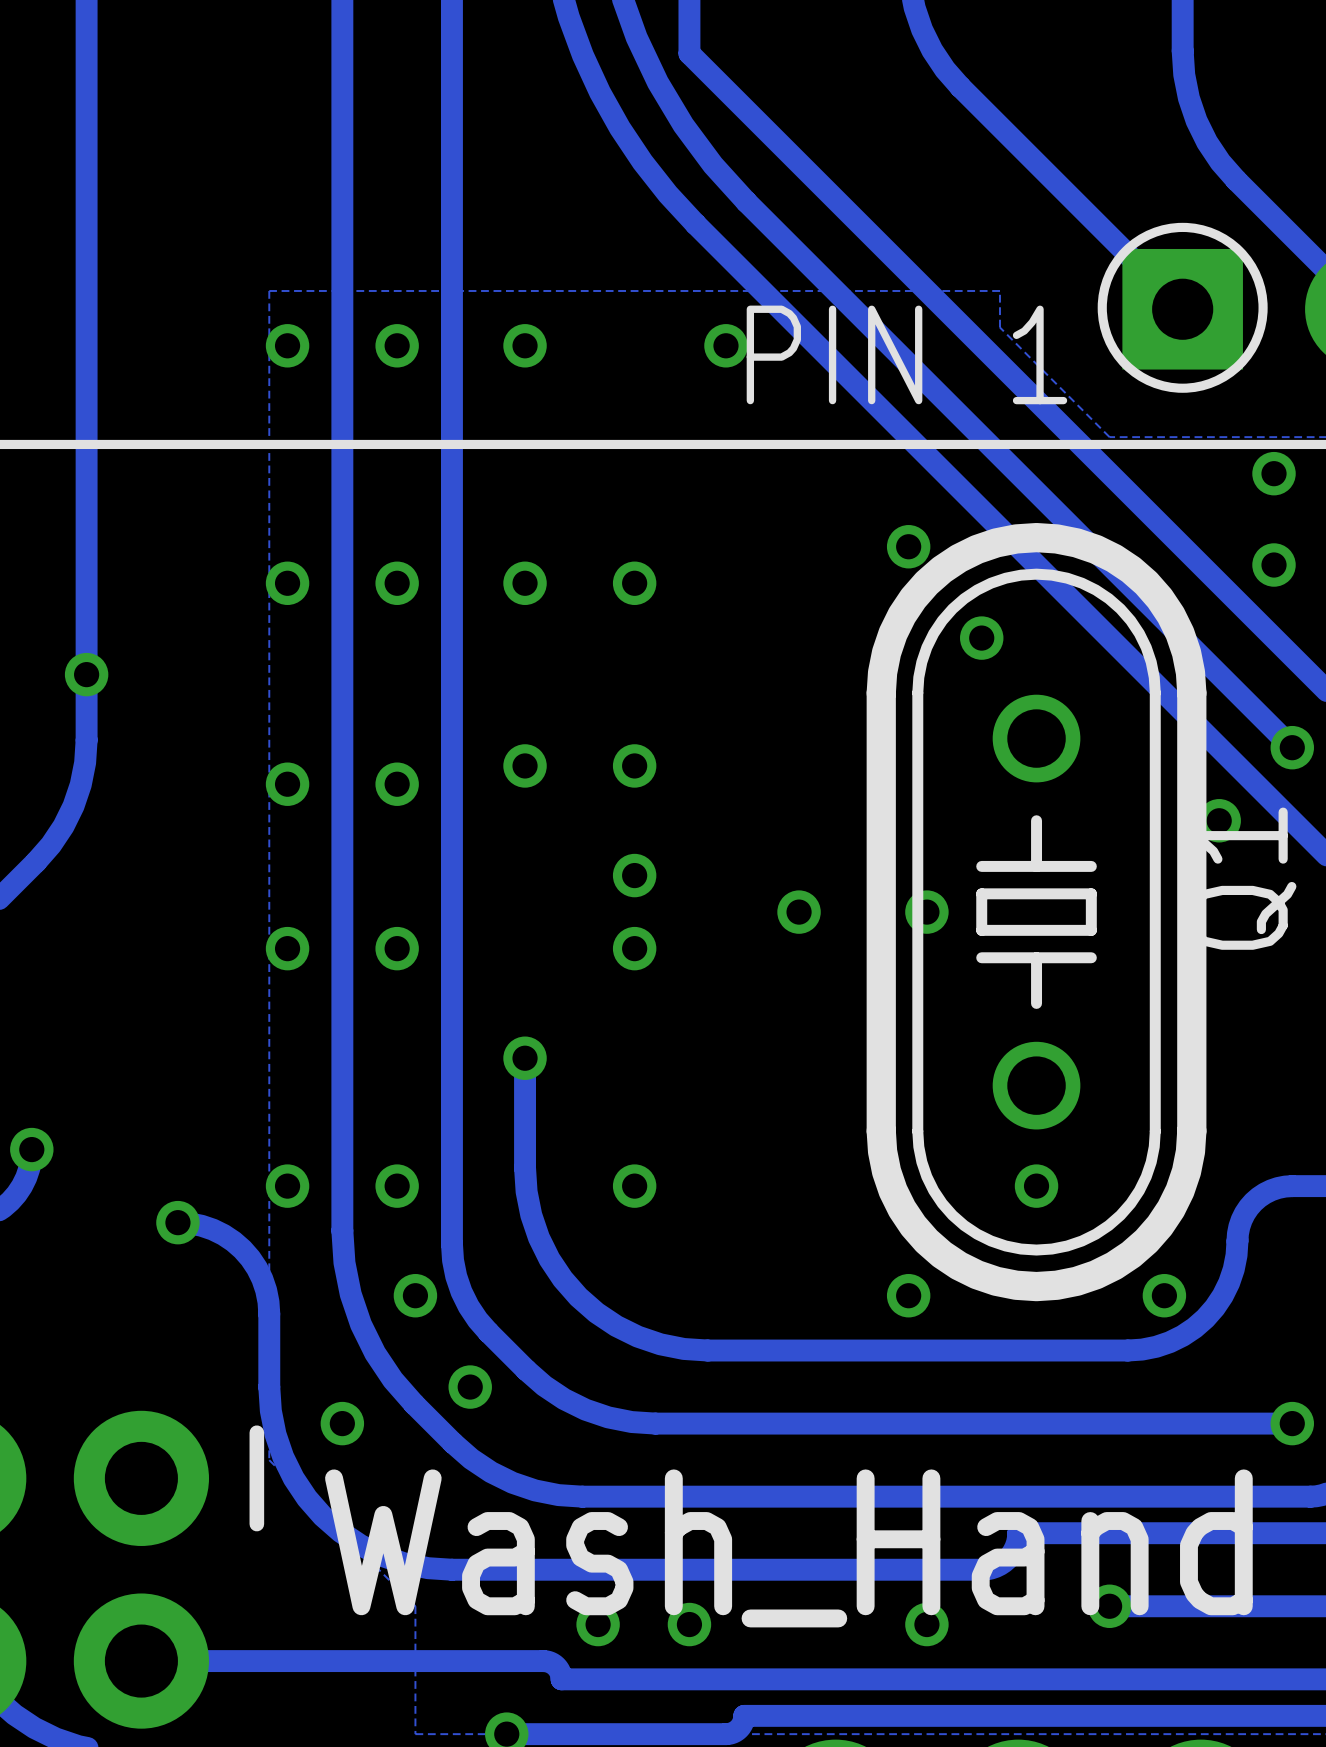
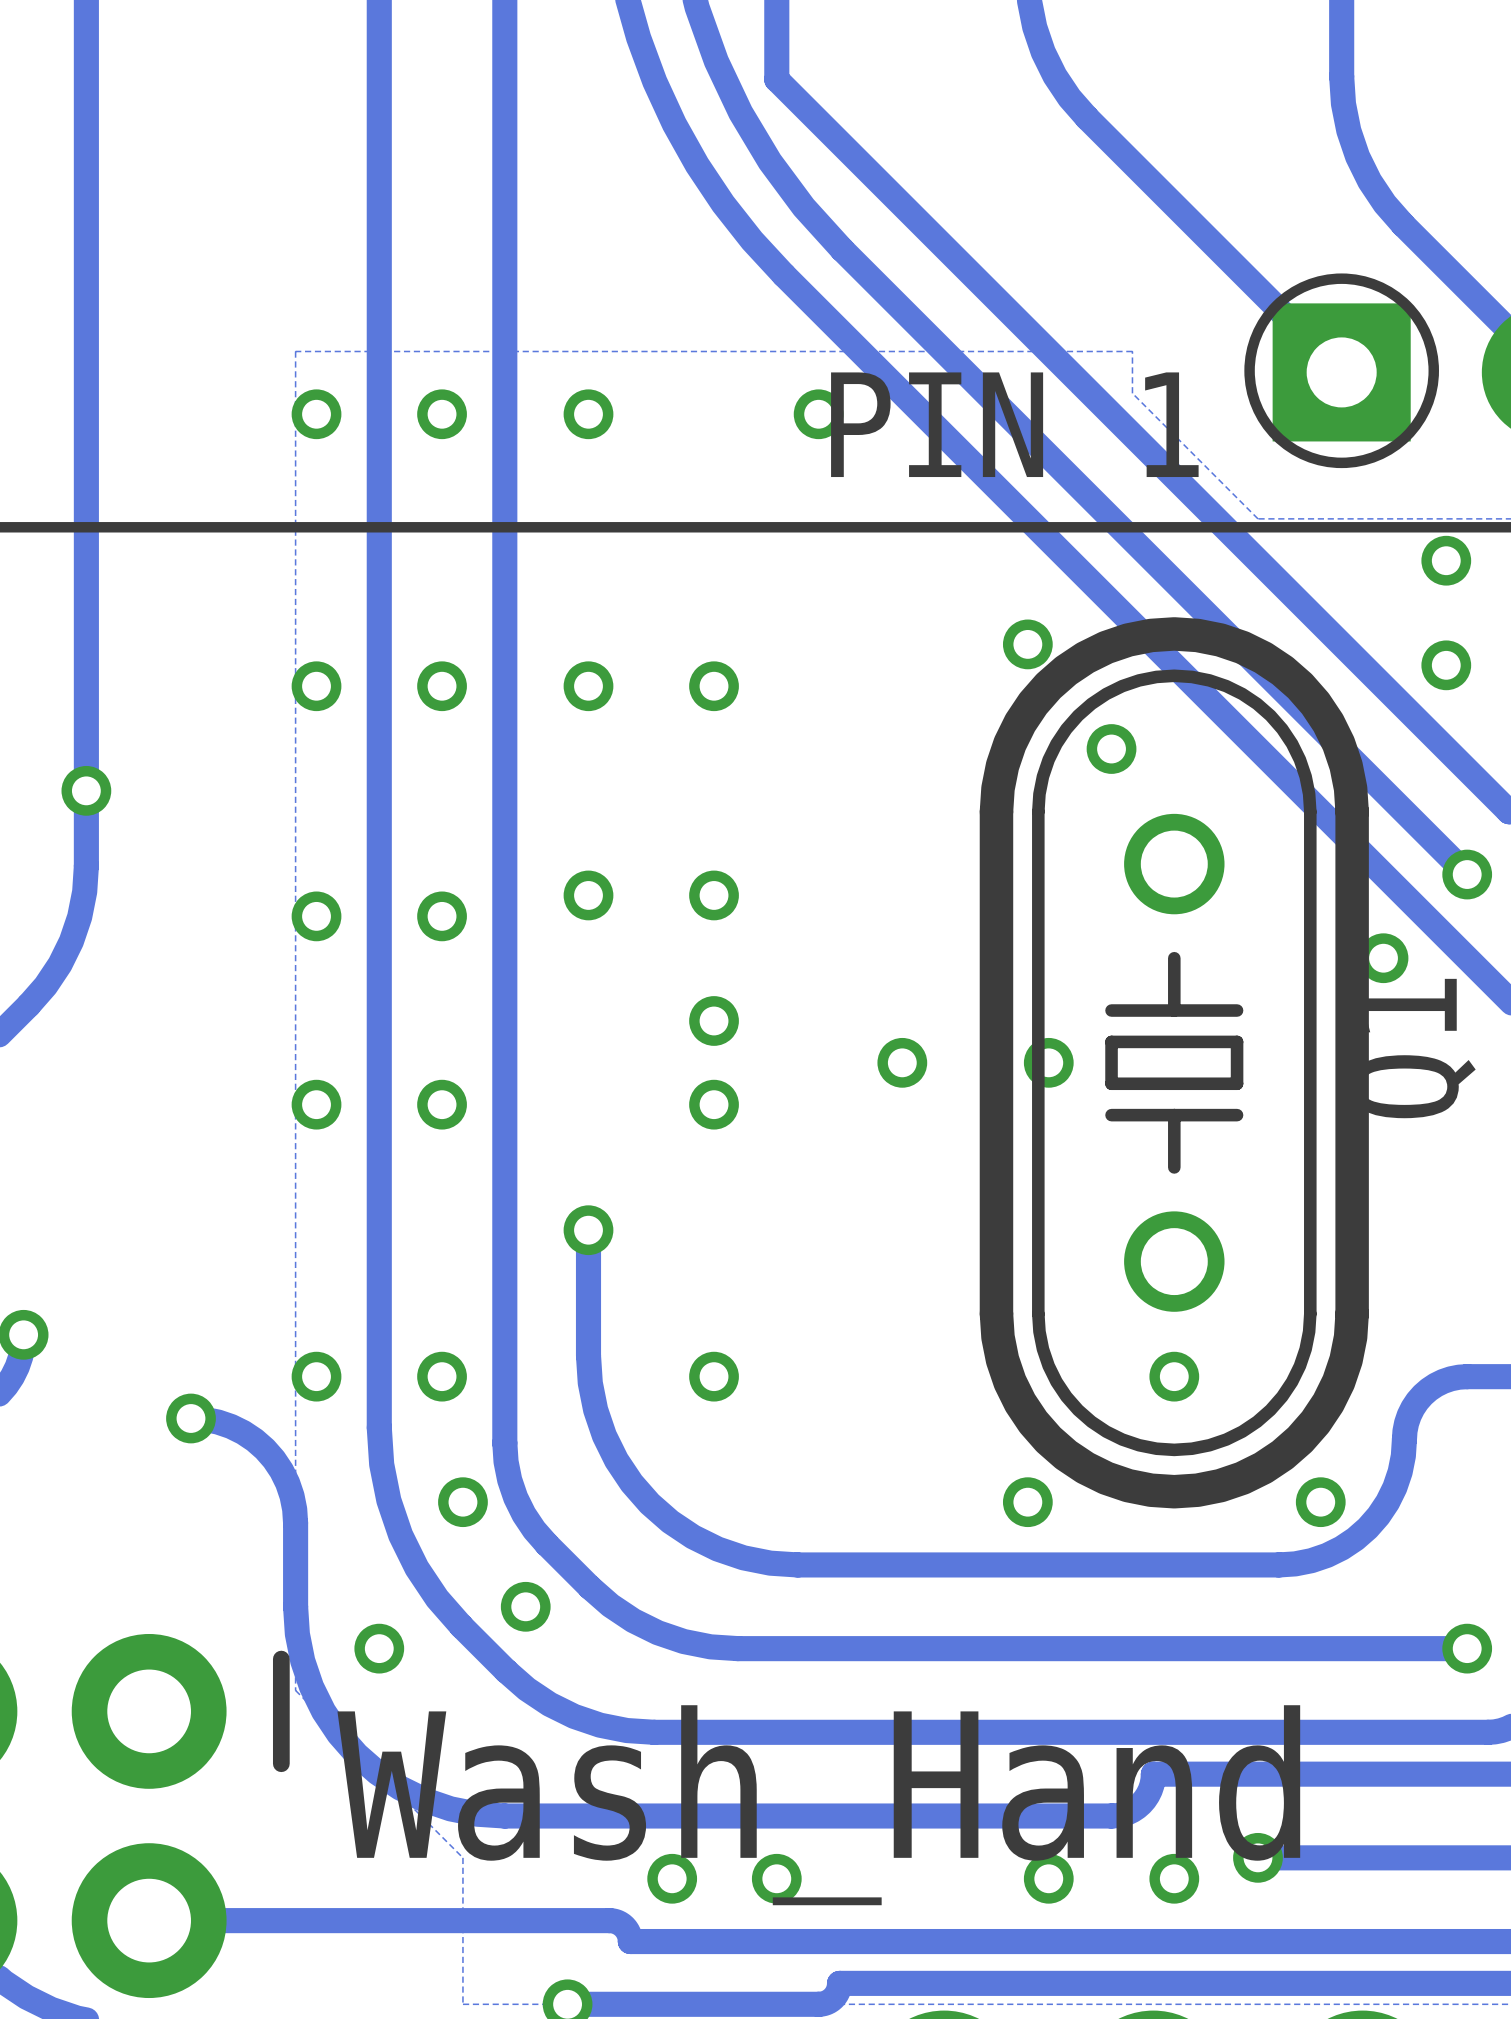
via: none -> (1174, 1878)

